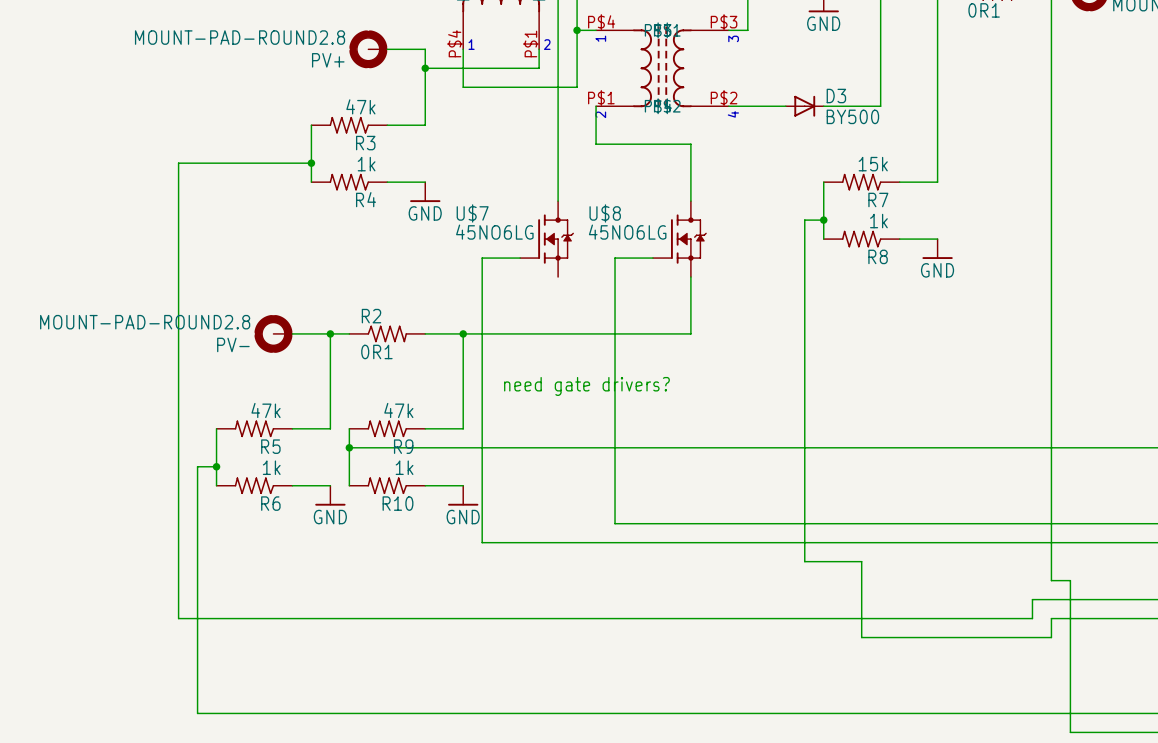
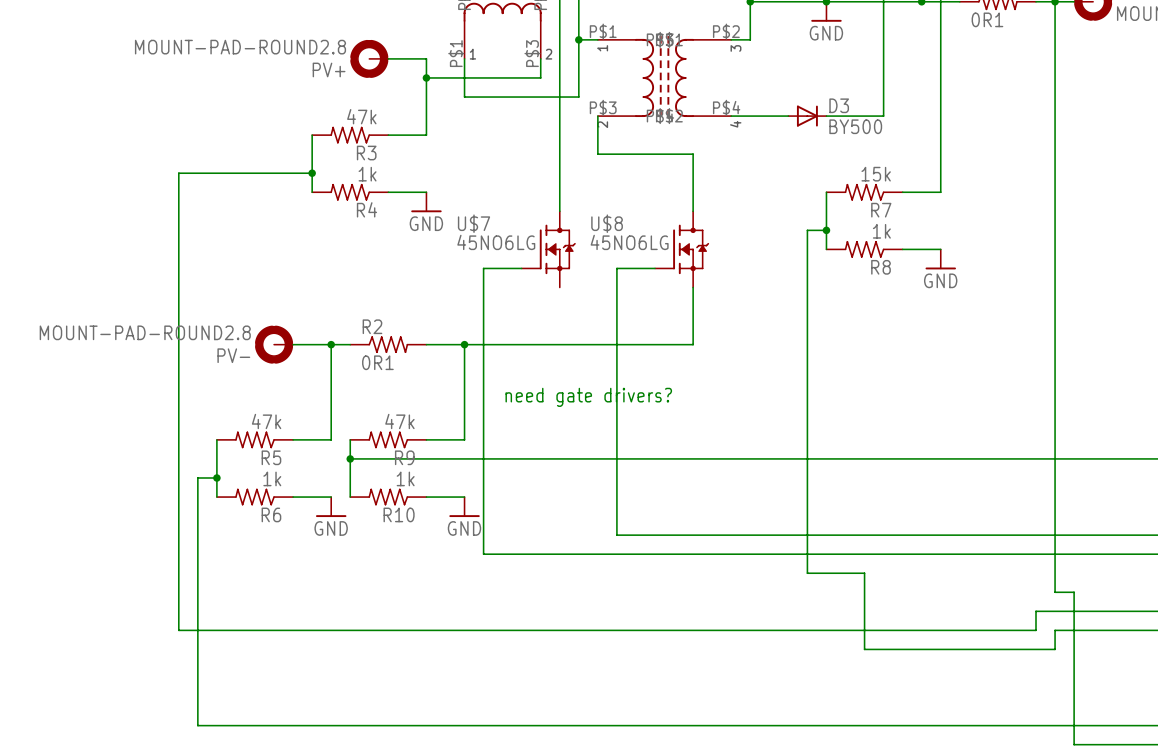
part pin number: P$4 (601, 22) -> P$1 (603, 31)
part pin number: P$3 (724, 22) -> P$2 (726, 31)
part pin number: P$4 (454, 43) -> P$1 (456, 53)
part pin number: P$1 (530, 44) -> P$3 (532, 53)
part pin number: P$1 (601, 98) -> P$3 (603, 107)
part pin number: P$2 (724, 98) -> P$4 (726, 107)

